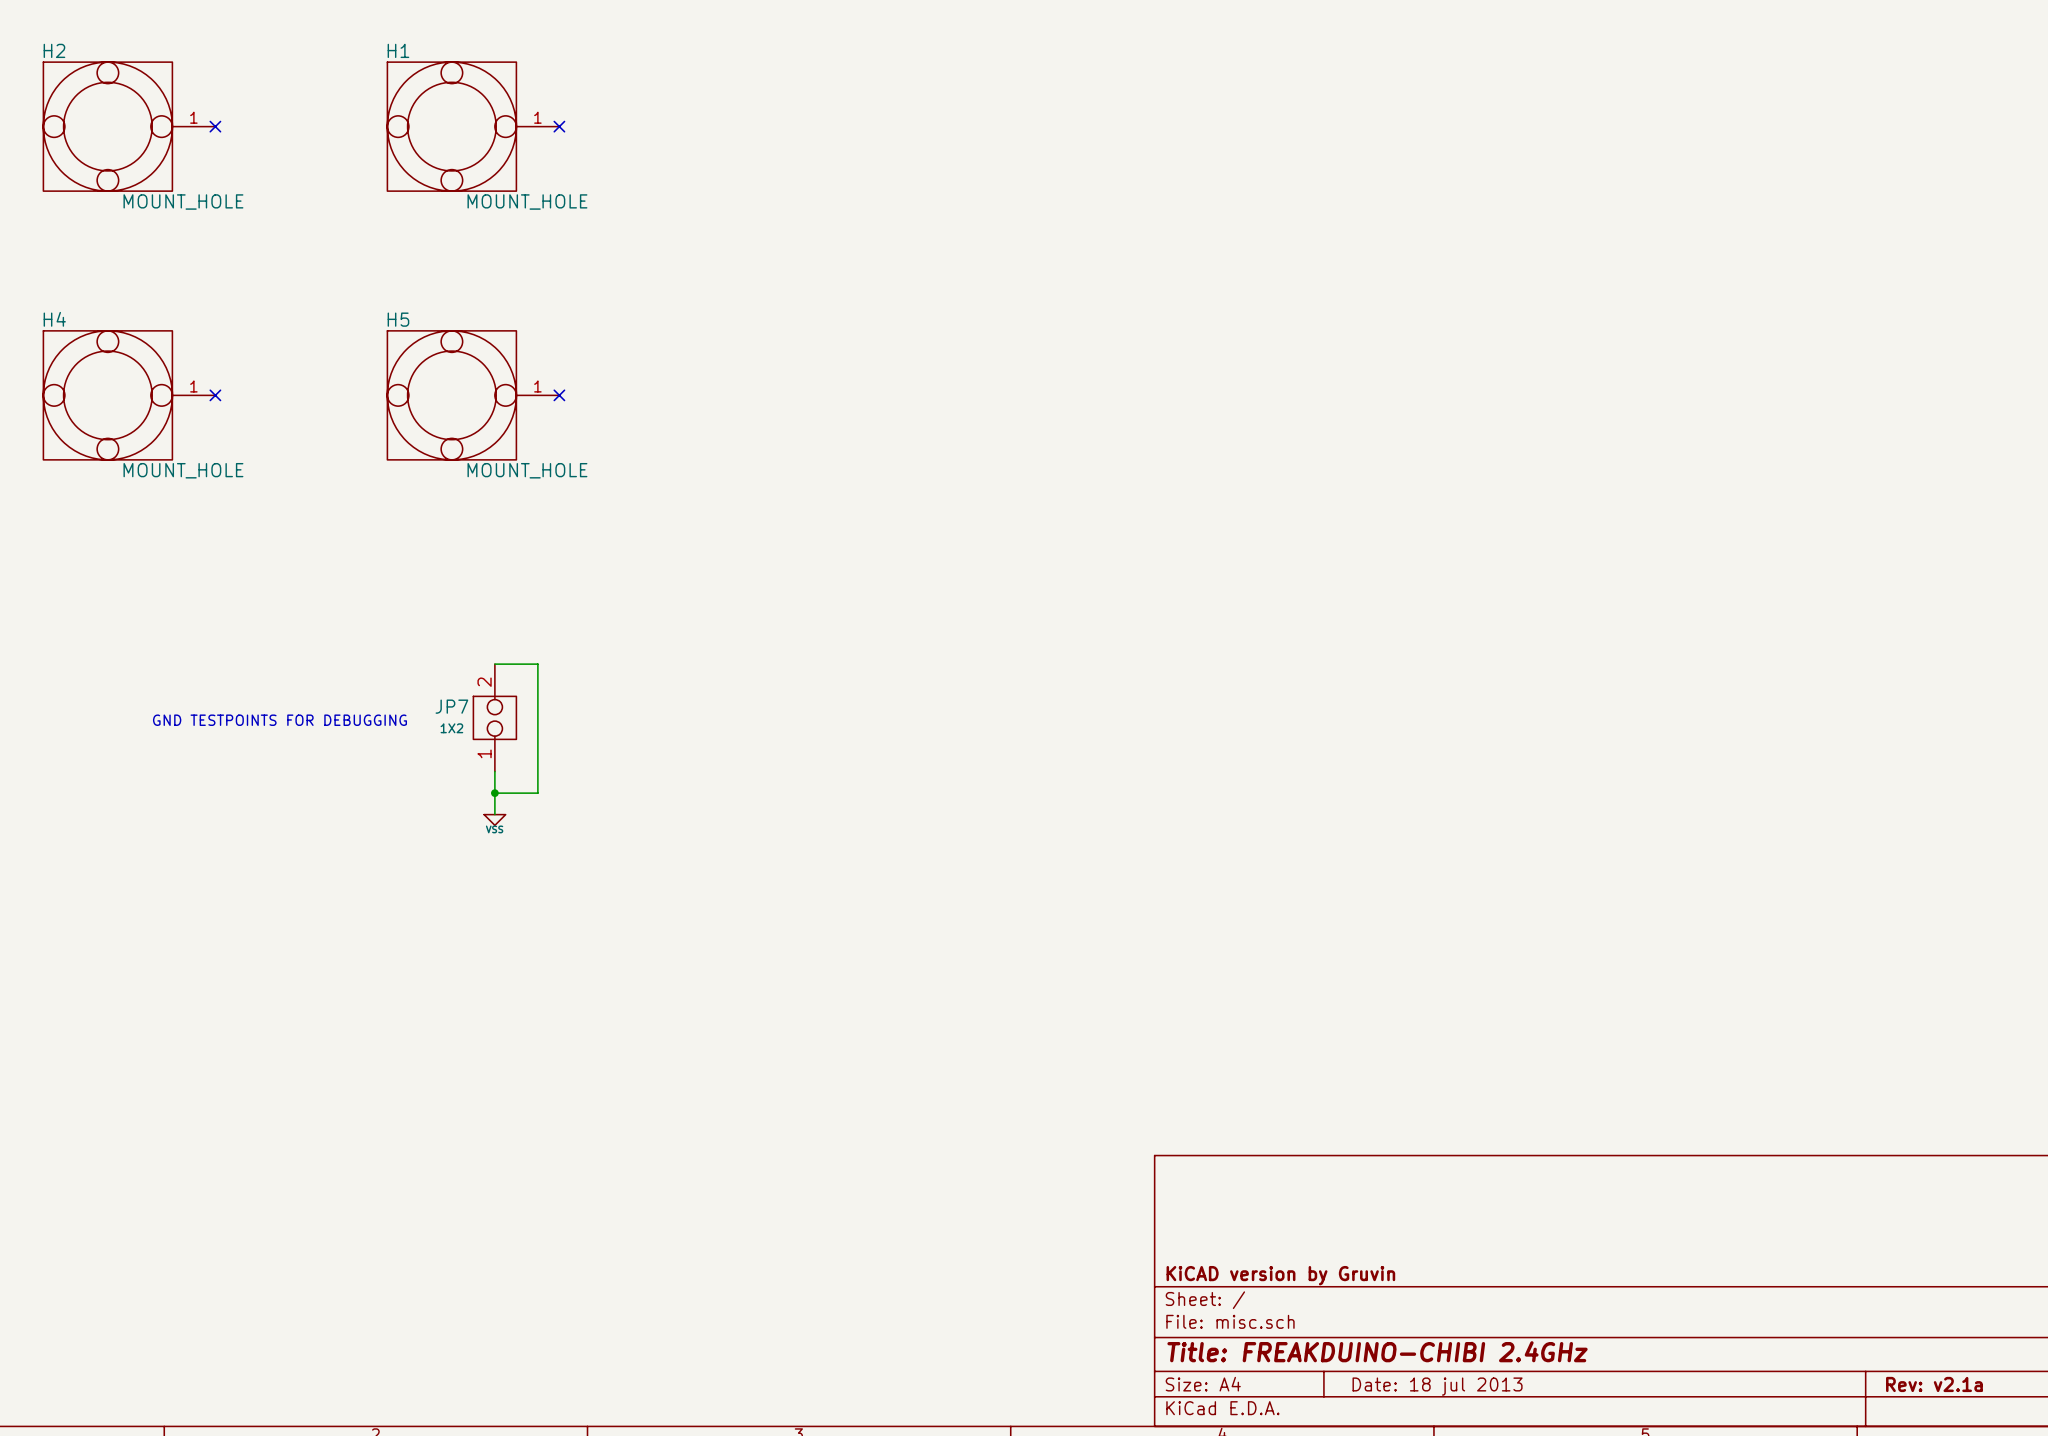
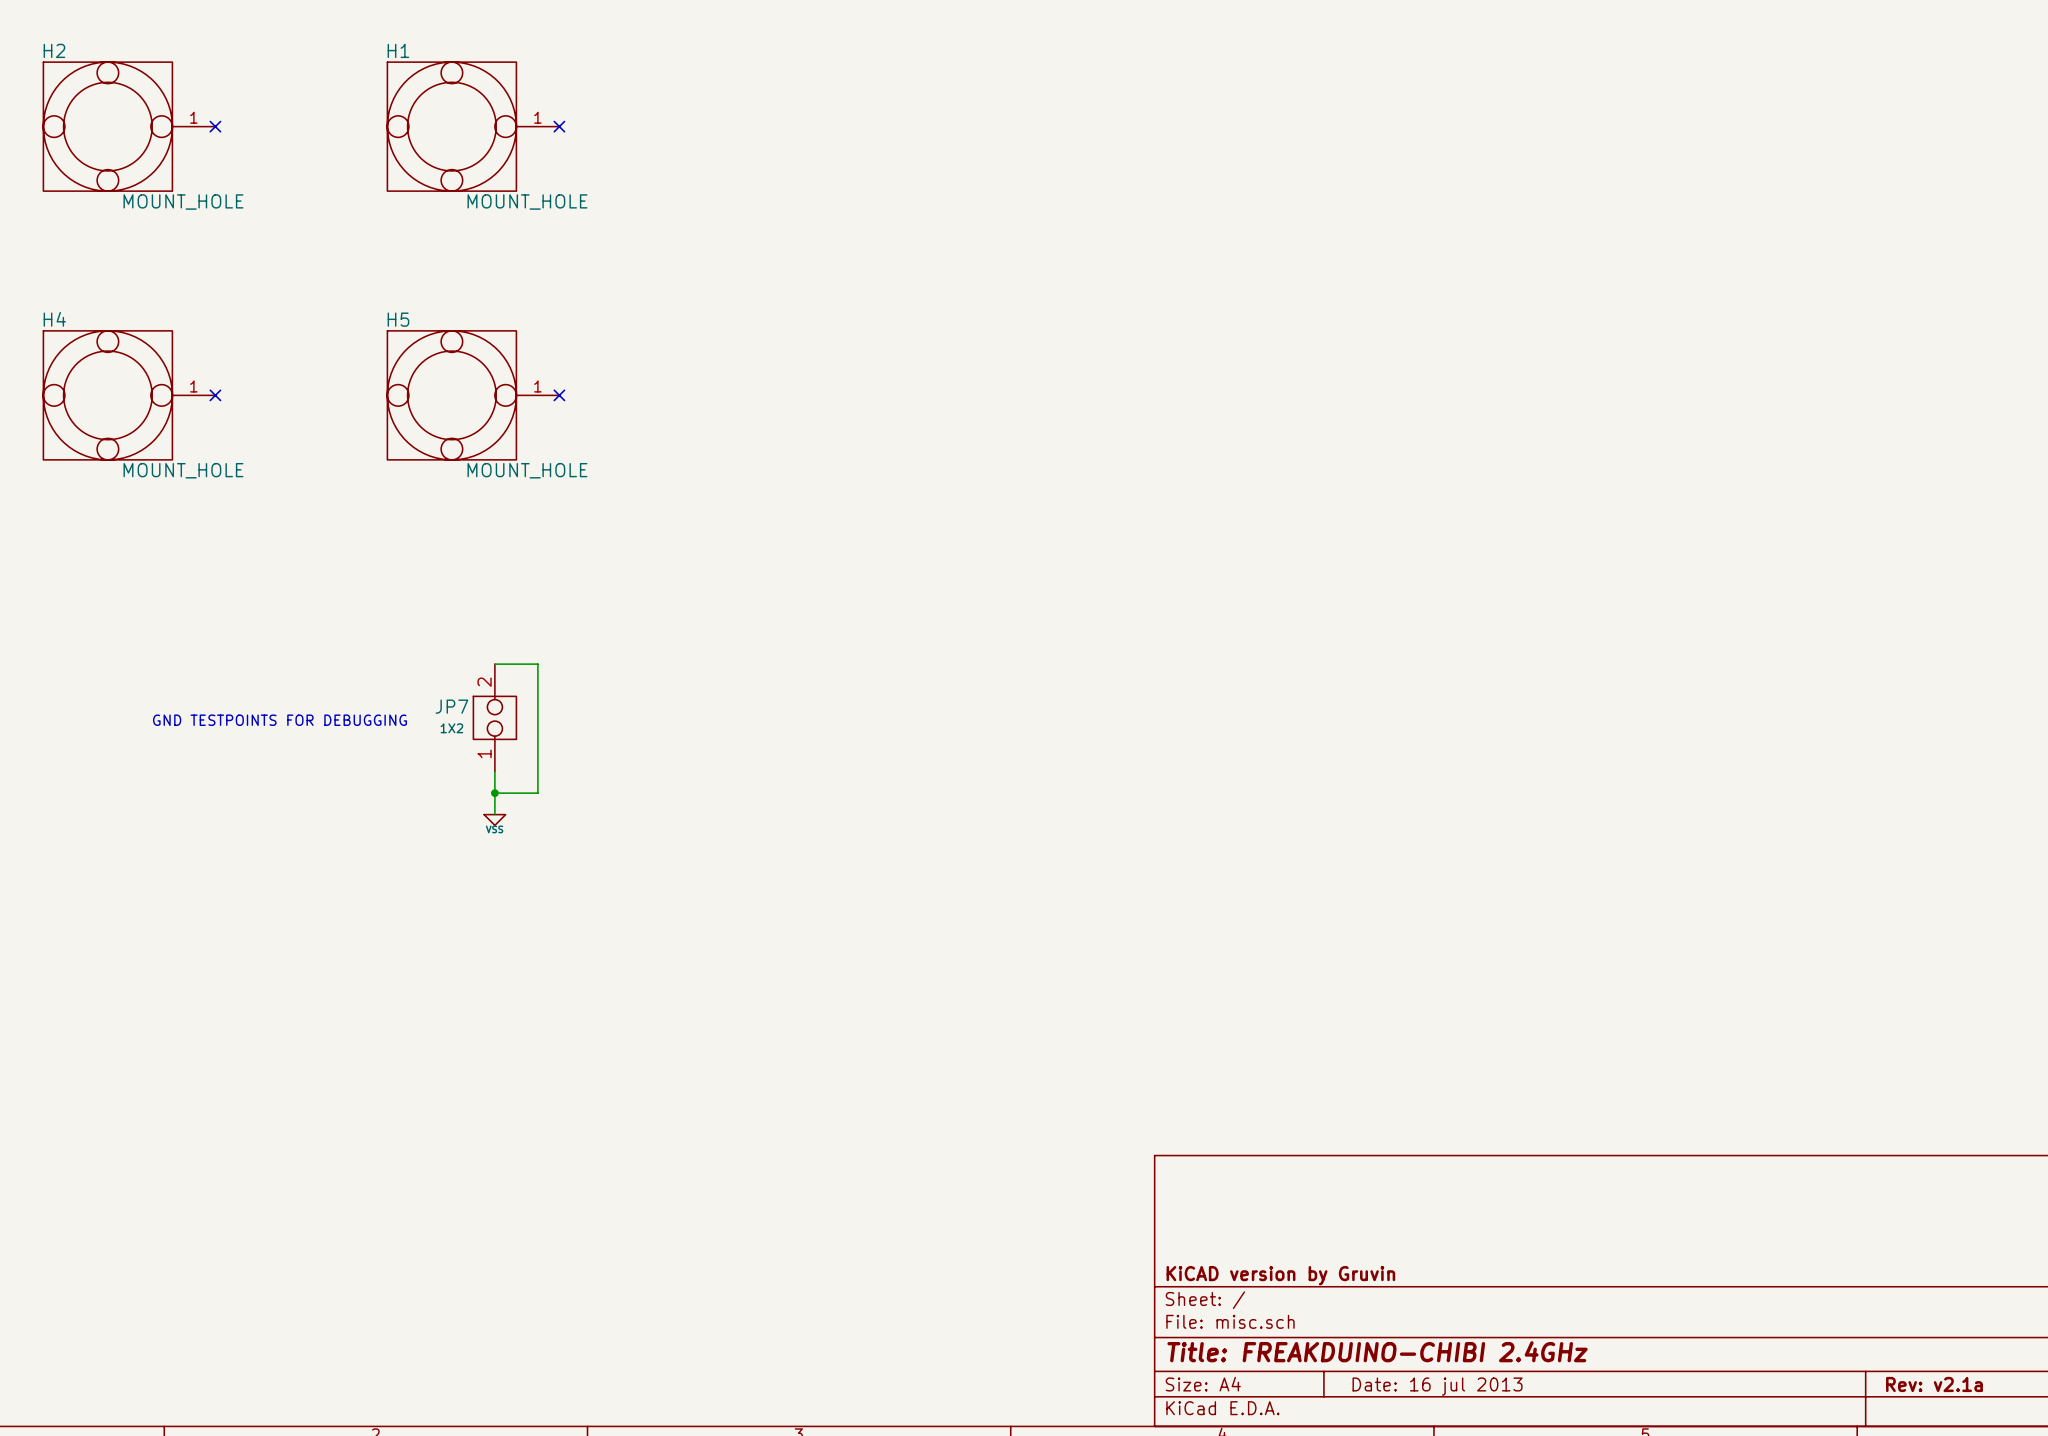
title block: Date: 18 jul 2013 (1437, 1386) -> Date: 16 jul 2013 (1437, 1386)

